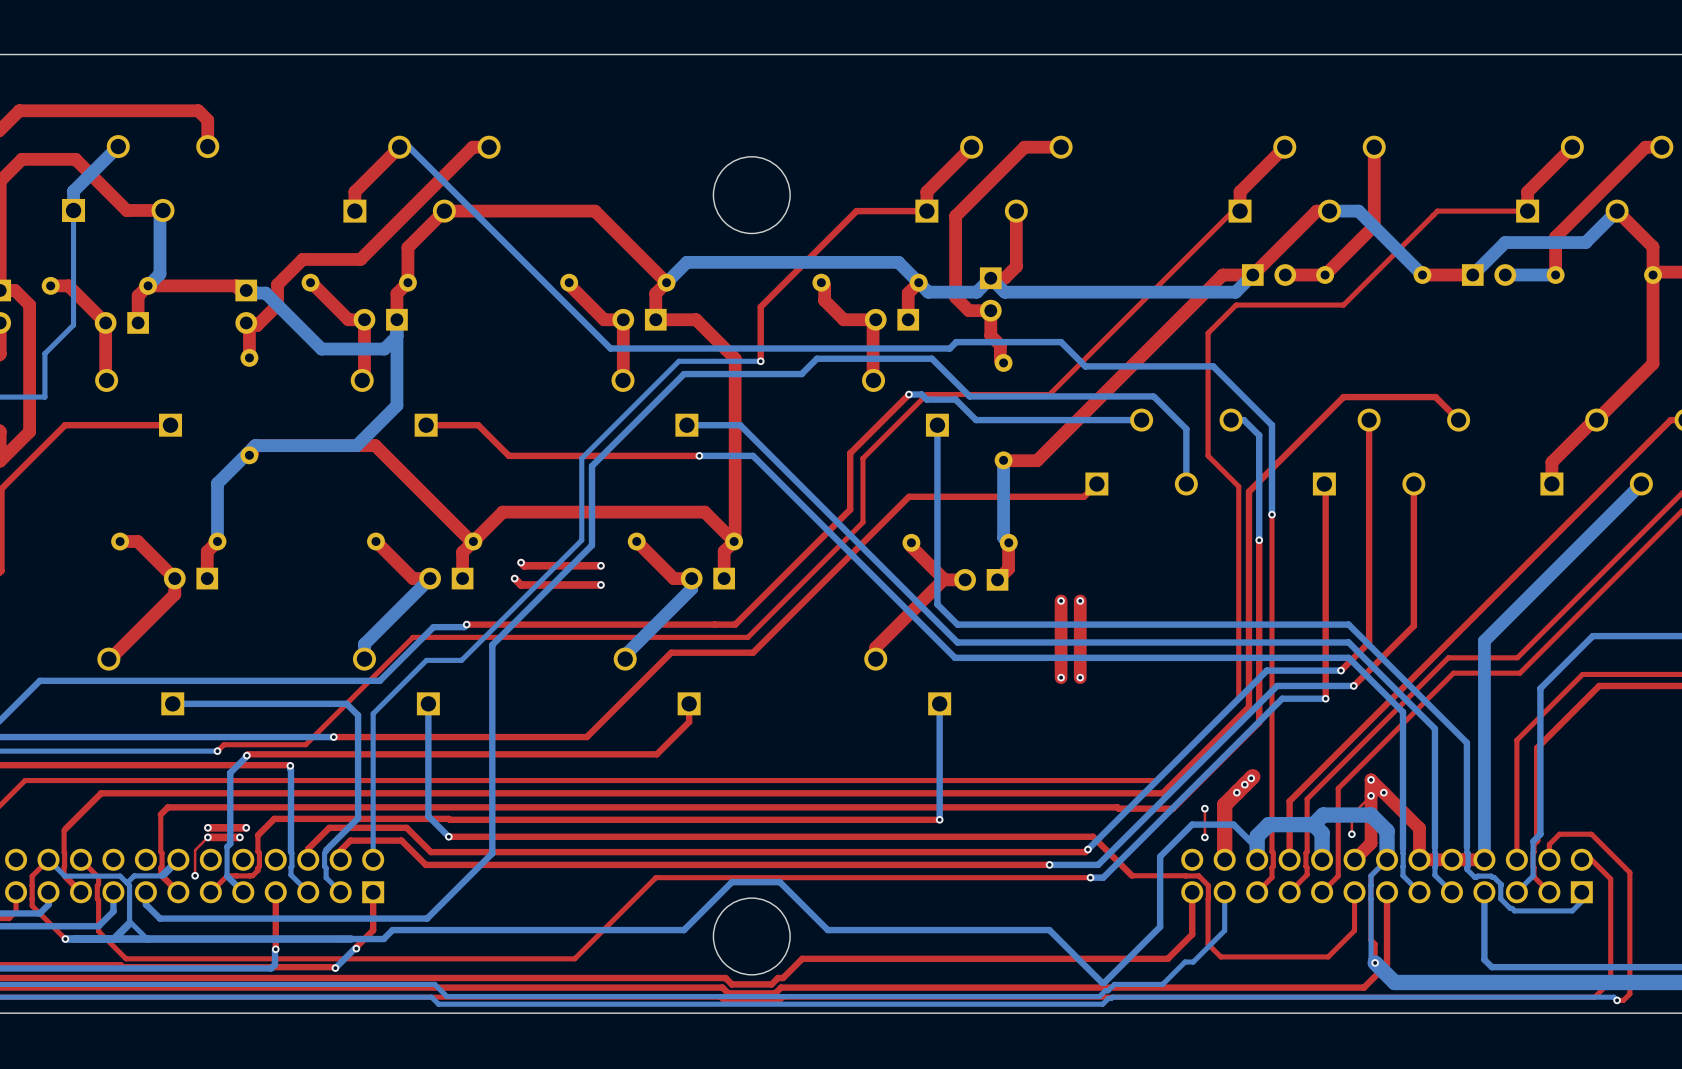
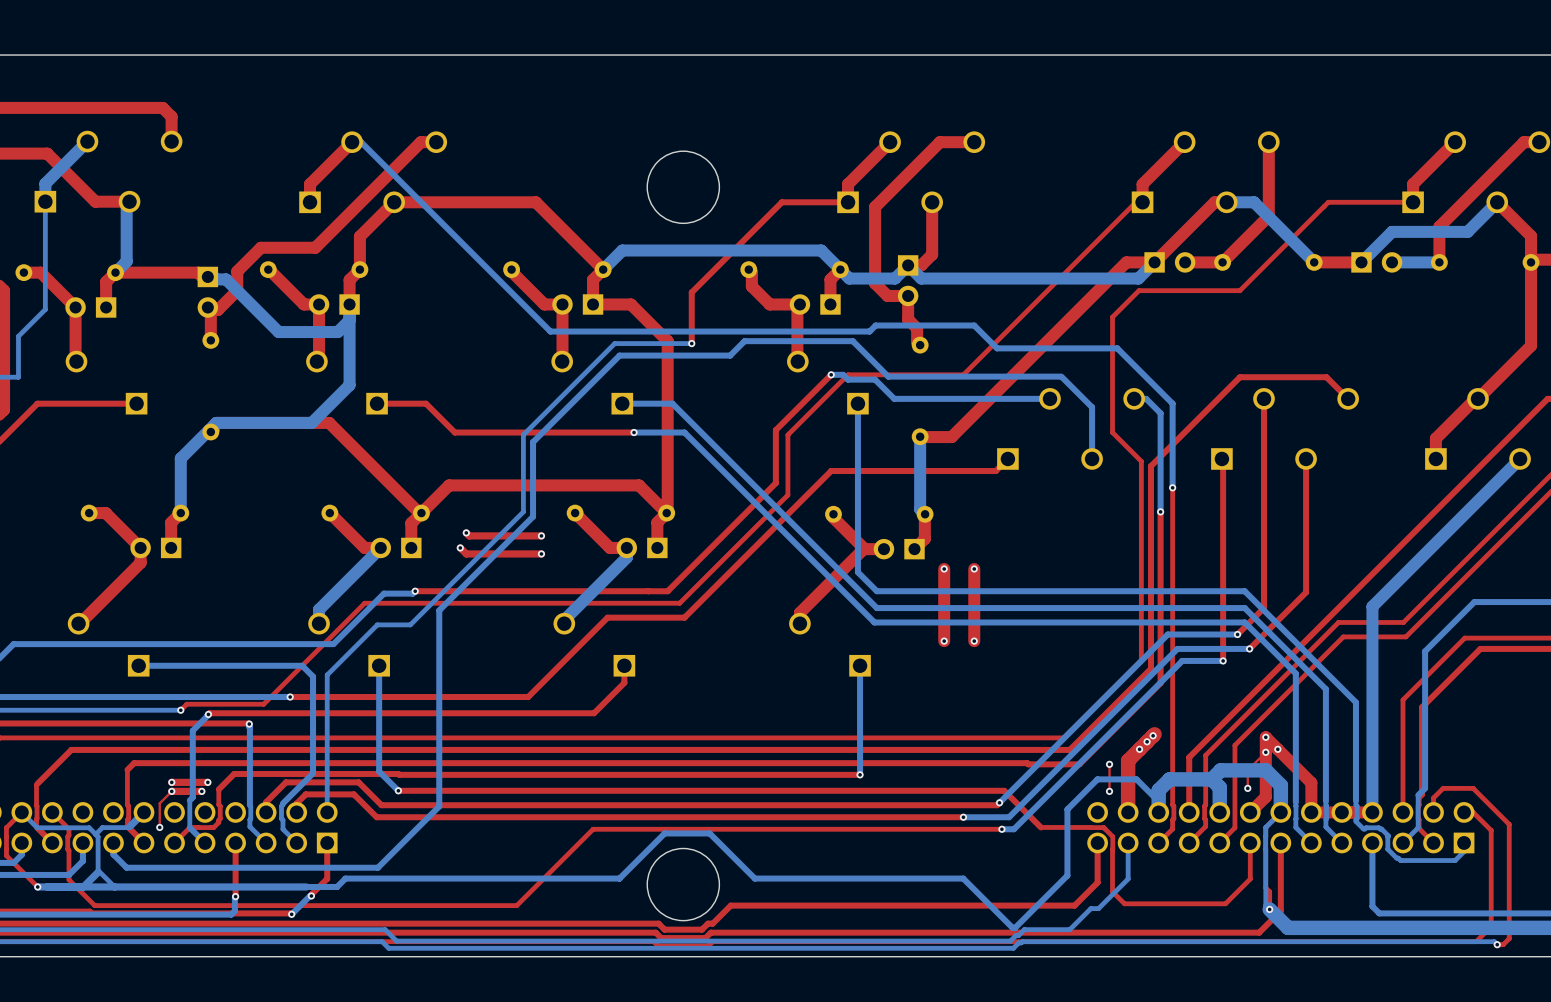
via: none -> (944, 568)
top track: (1080, 600) (1080, 677) -> (944, 568) (944, 641)
via: (1080, 600) -> none
via: none -> (944, 641)
via: (1080, 677) -> none

